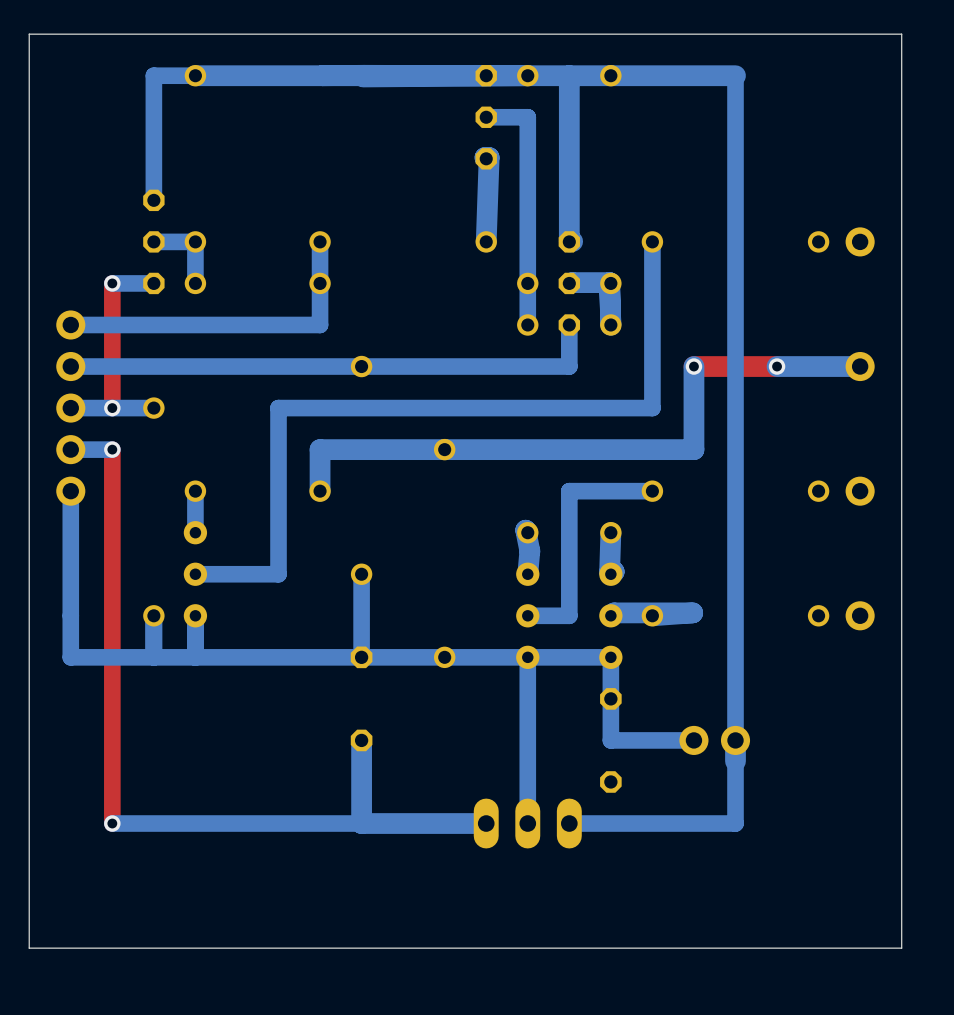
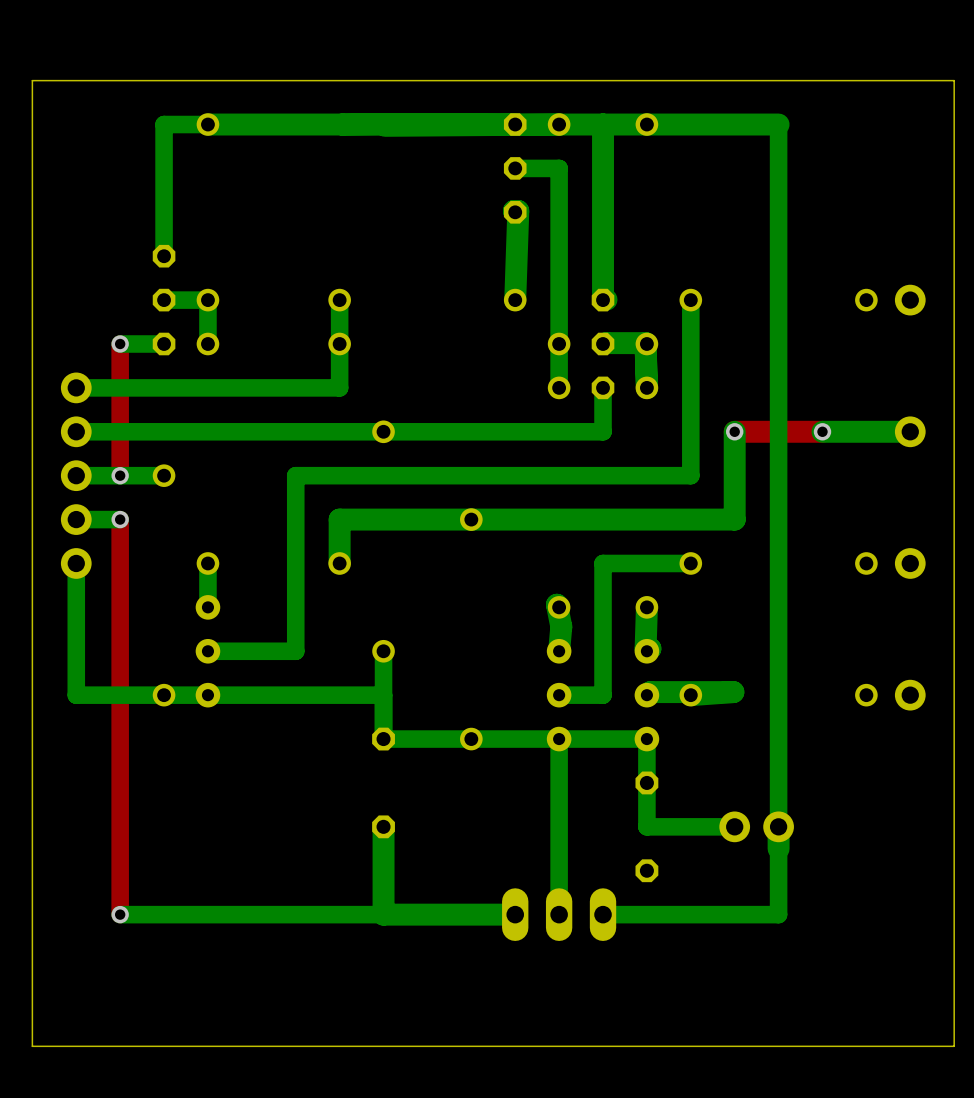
bottom track: (70, 615) (70, 657) (361, 657) -> (76, 695) (383, 695)
bottom track: (195, 615) (195, 657) -> none

